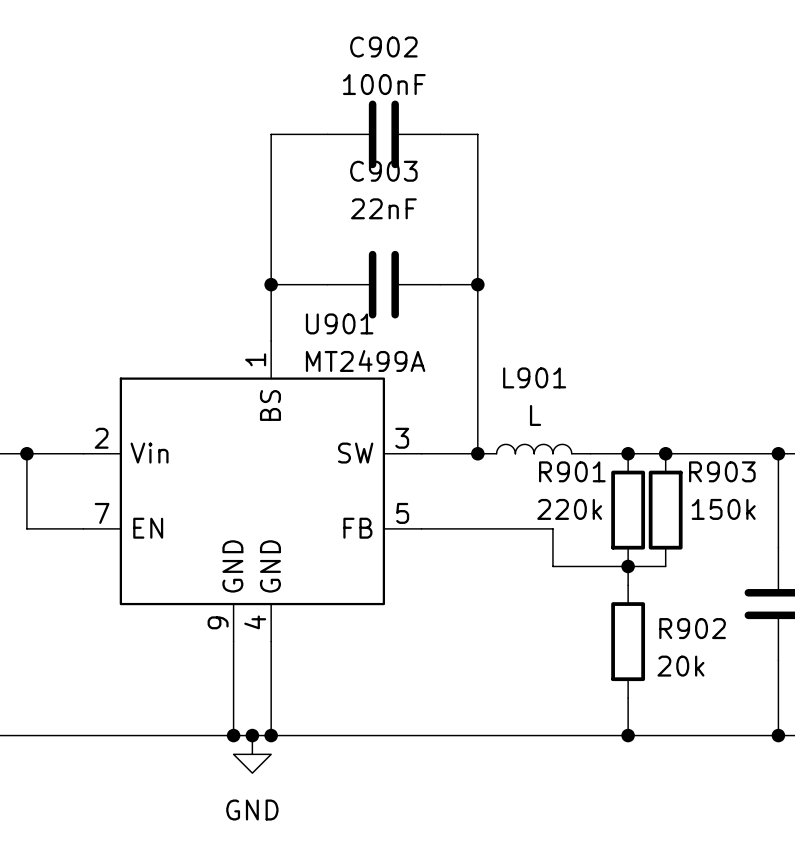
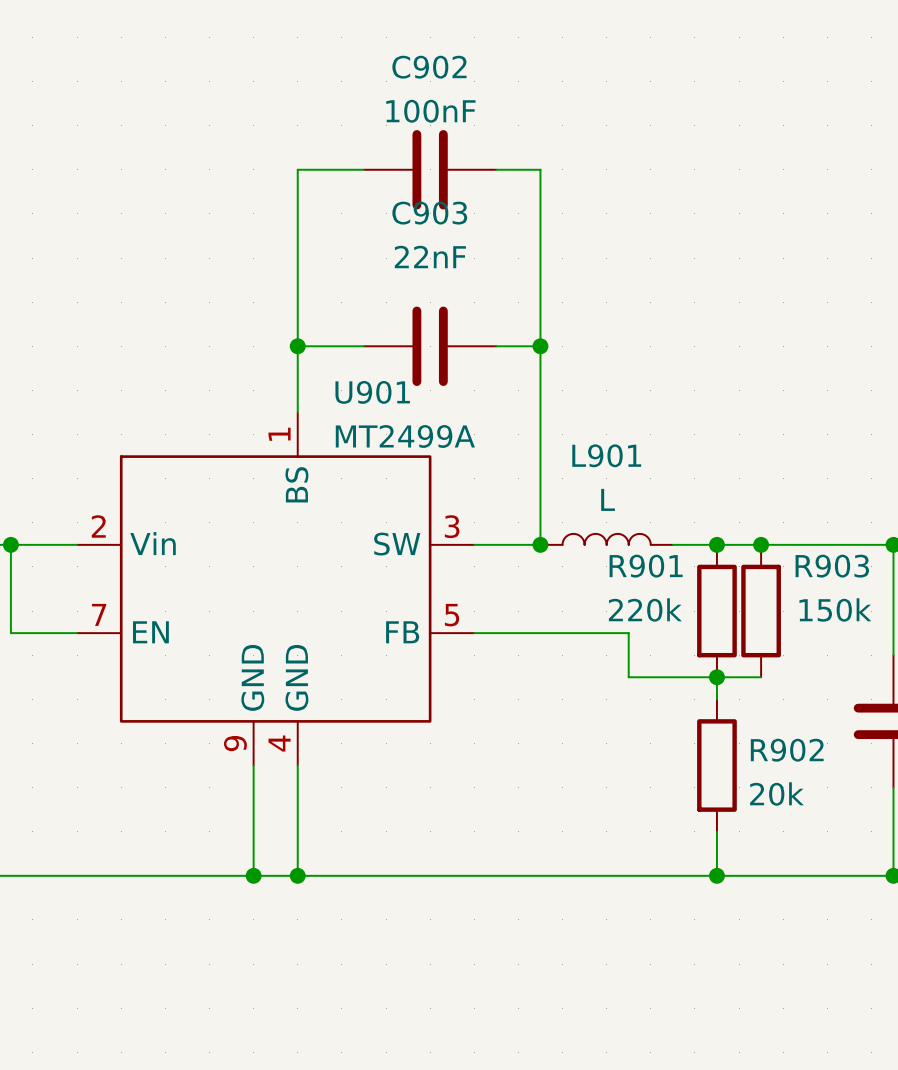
junction: (252, 735) -> none
power symbol: GND (252, 754) -> none

